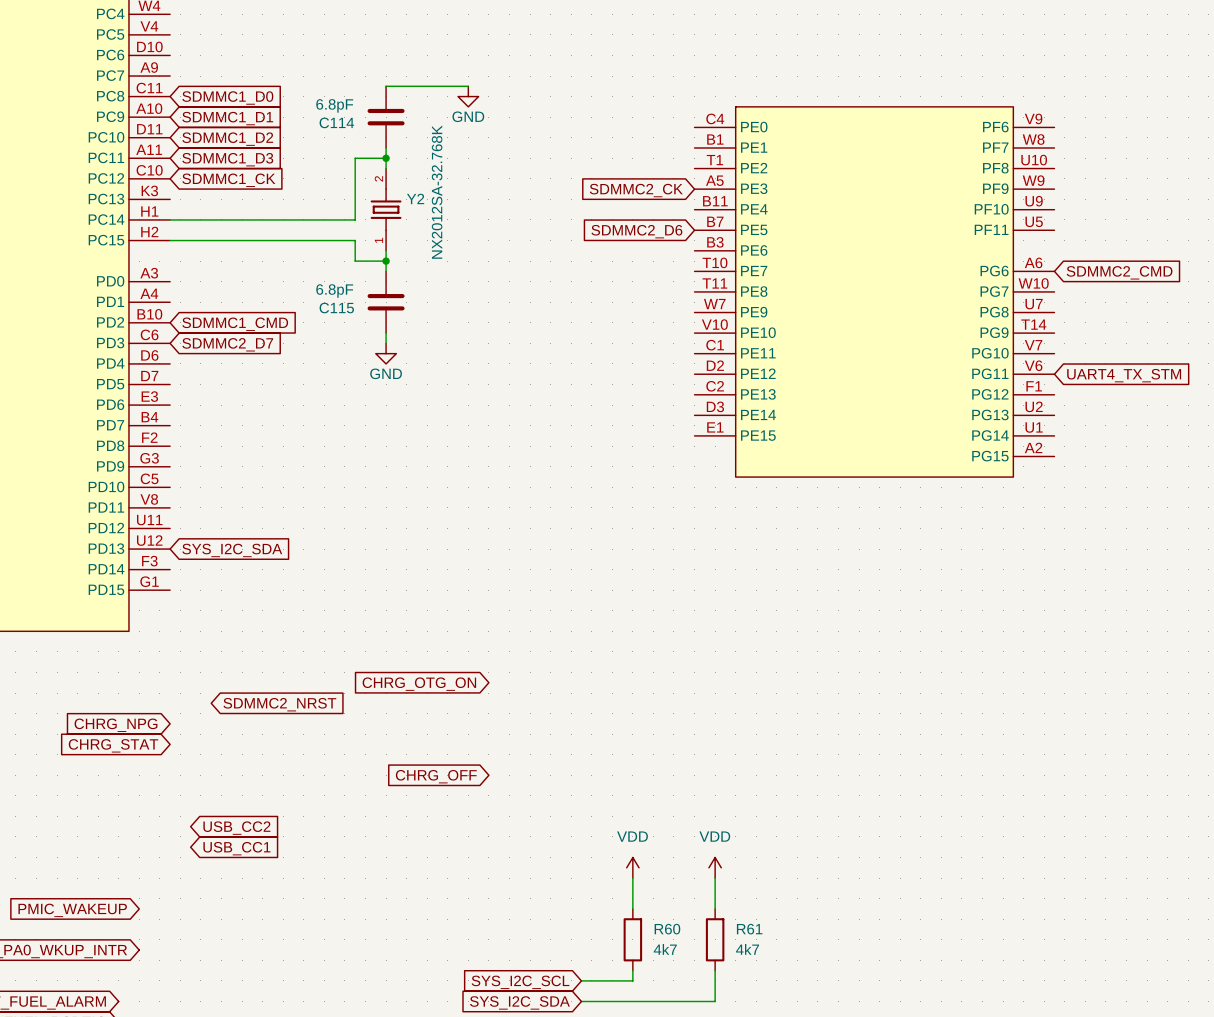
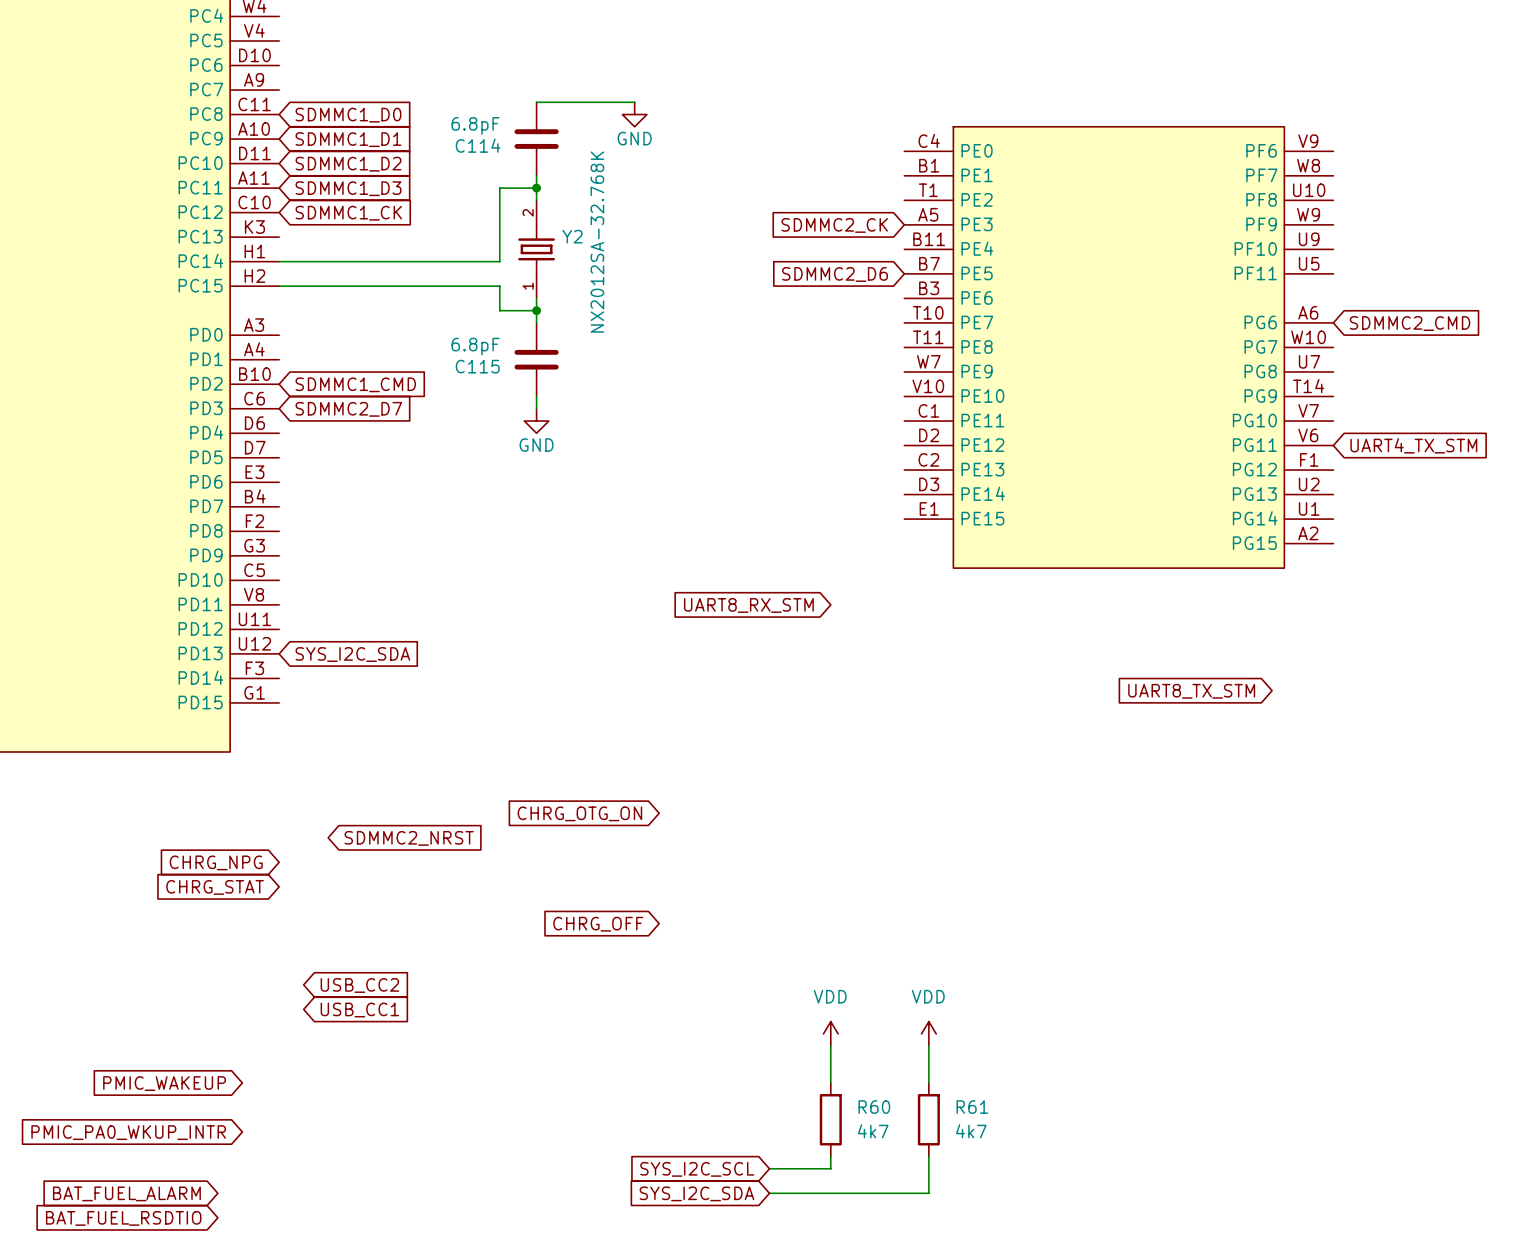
global label: none -> UART8_RX_STM (748, 605)
global label: none -> UART8_TX_STM (1191, 691)

